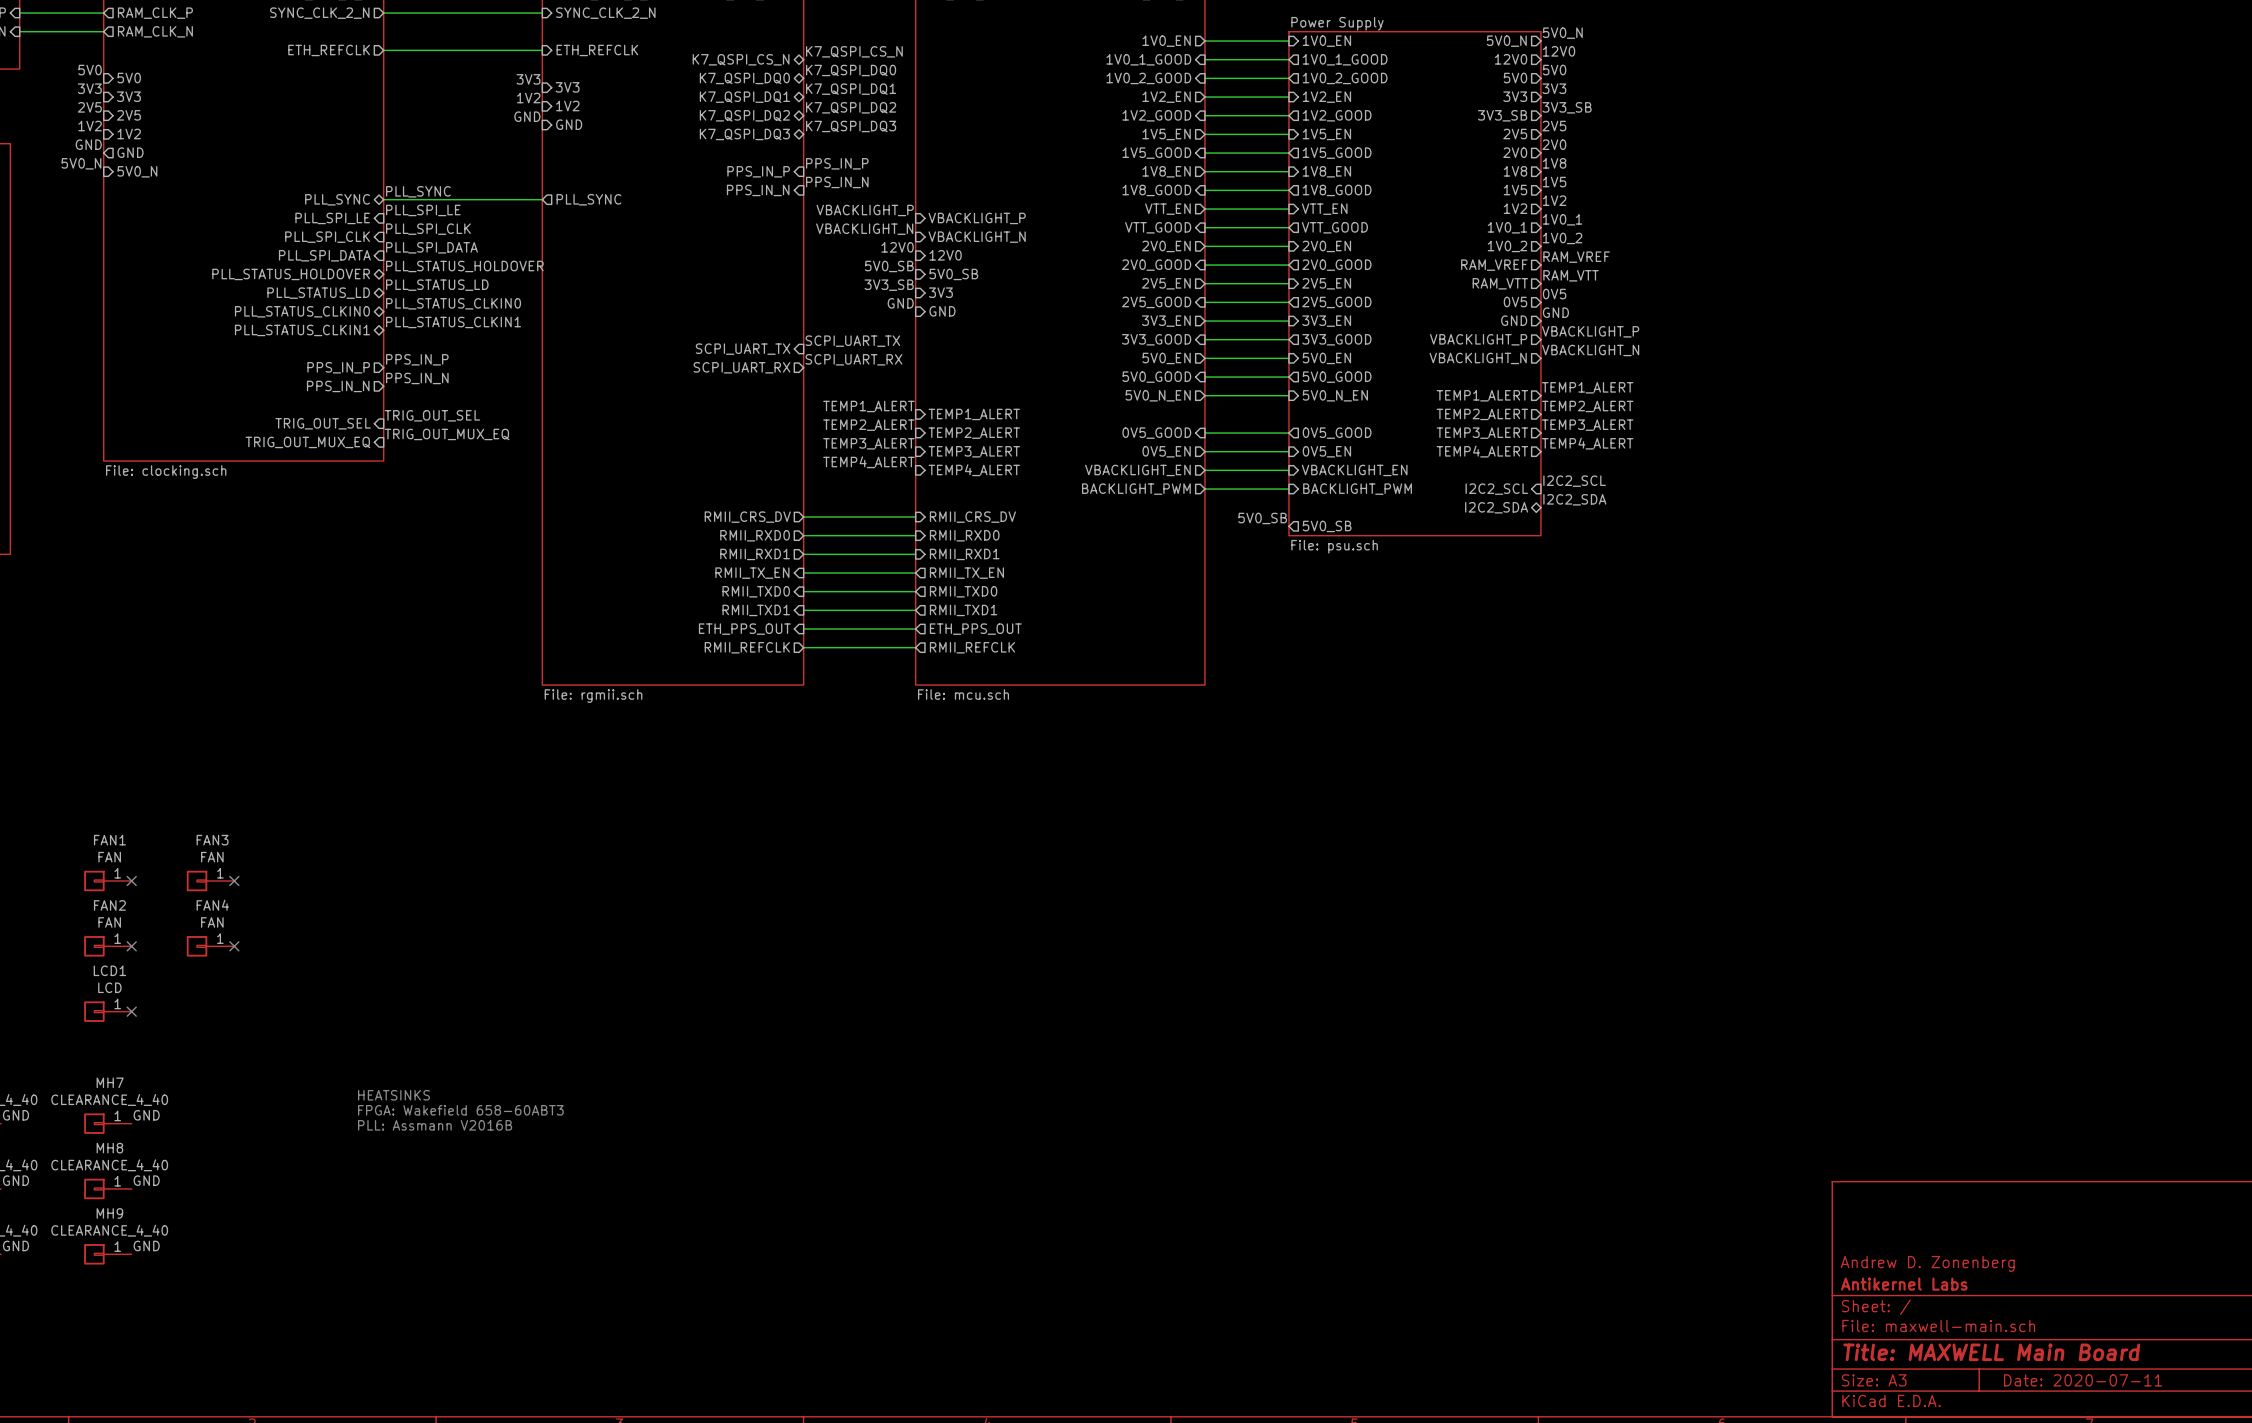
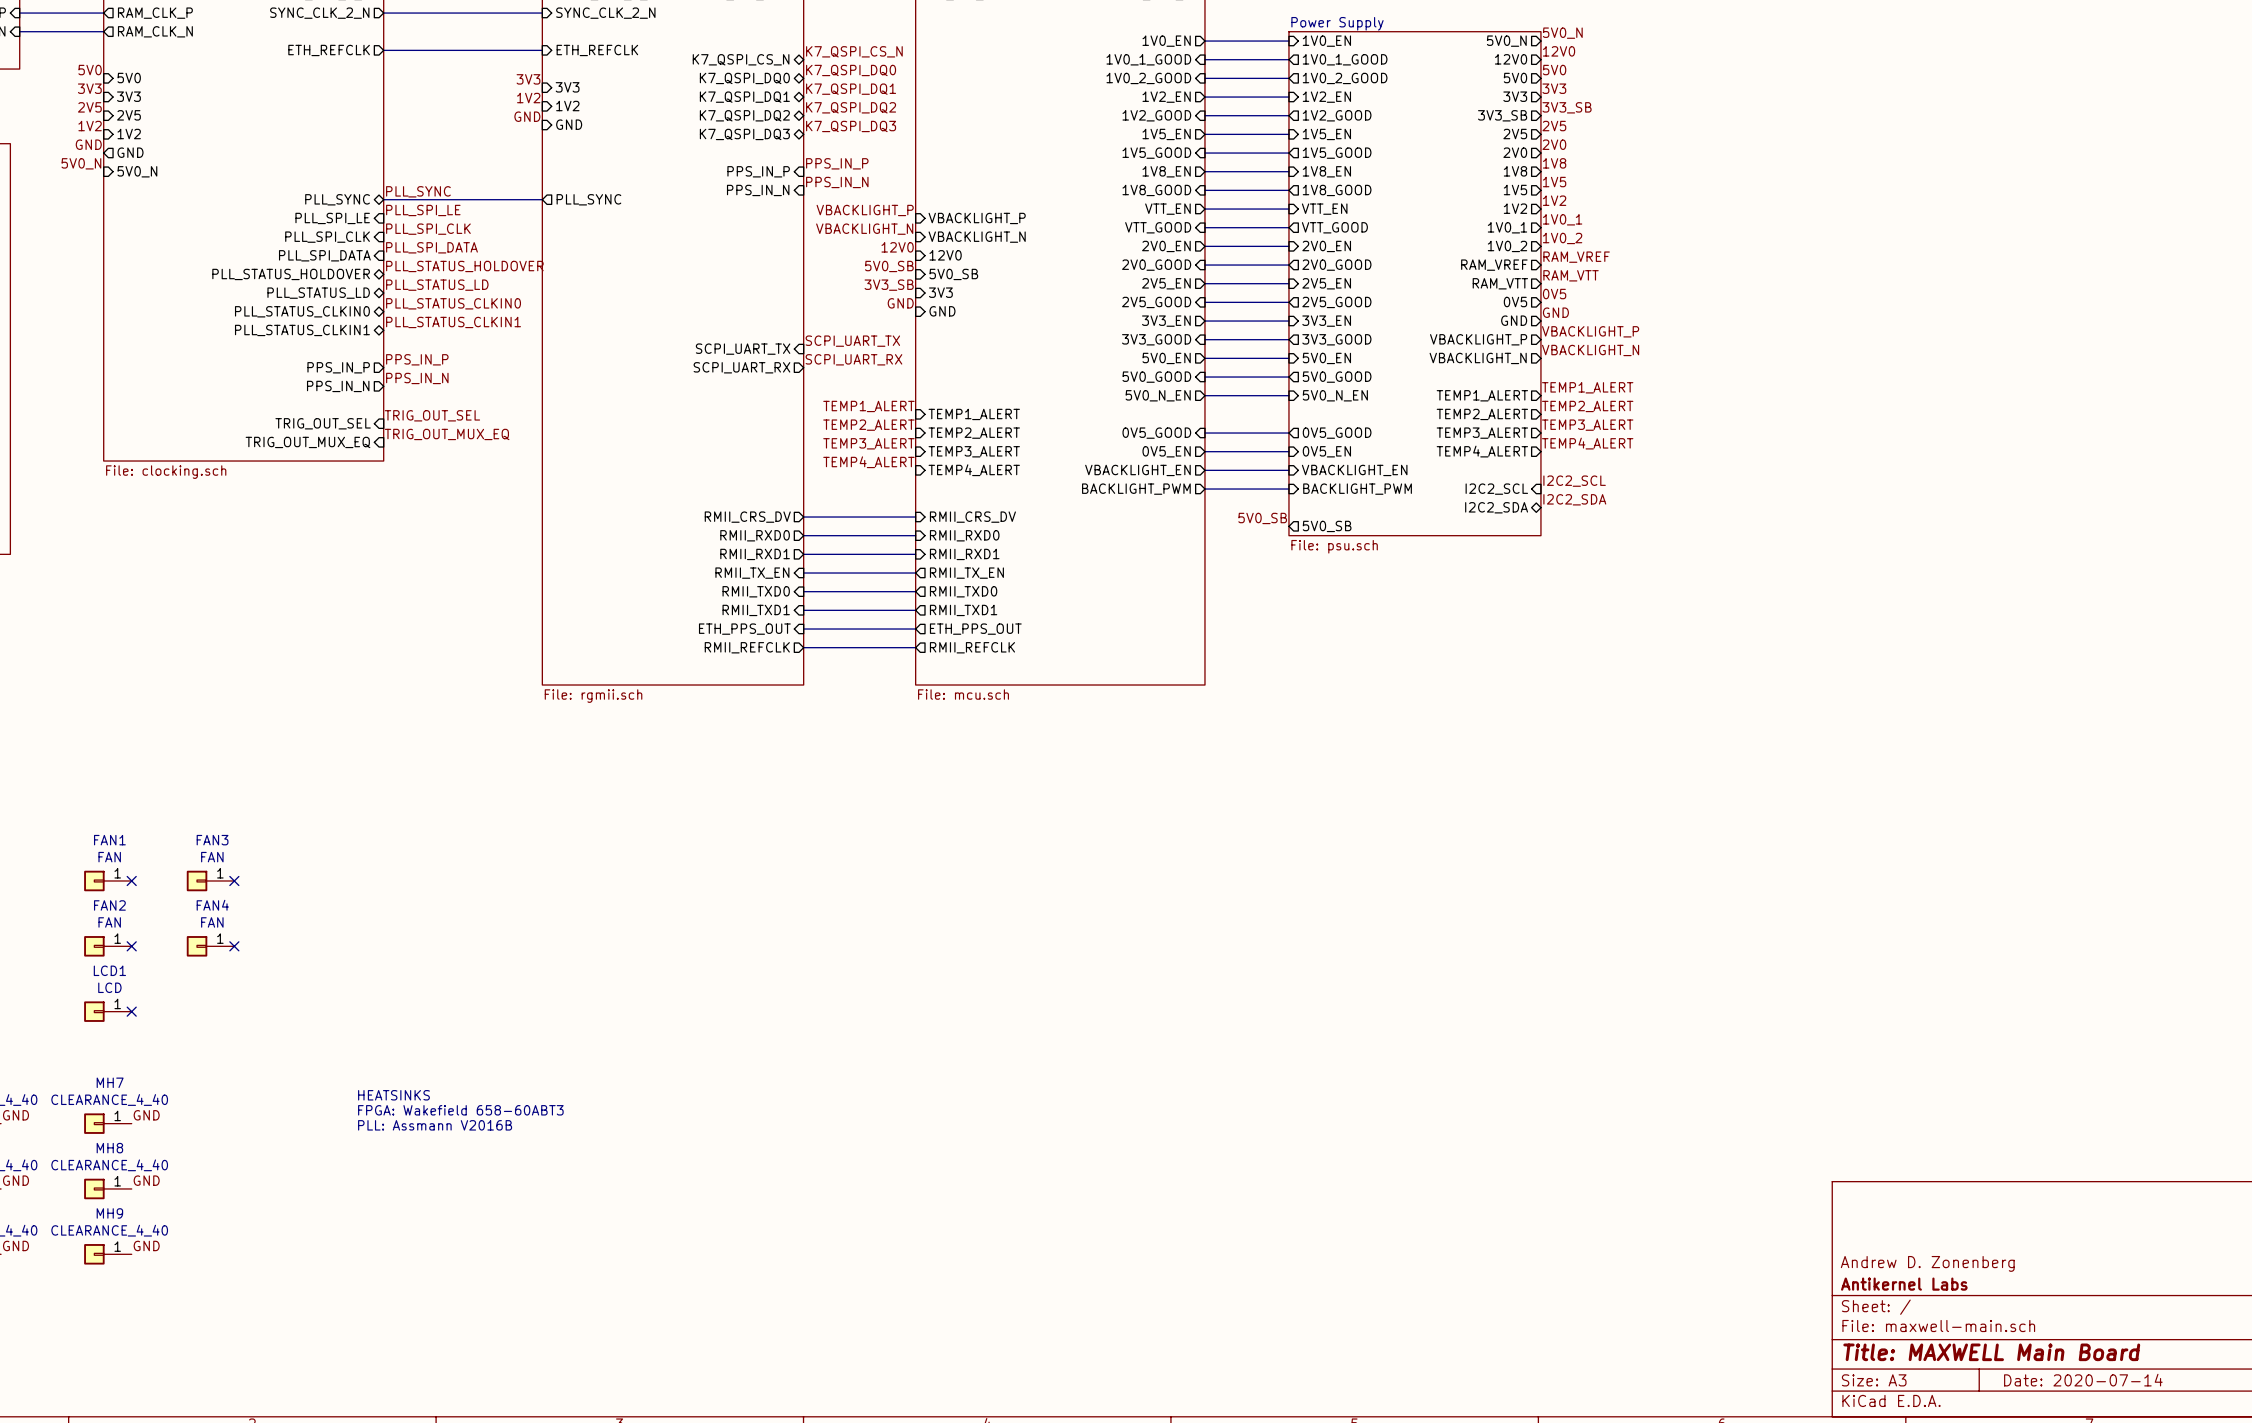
title block: Date: 2020-07-11 (2083, 1380) -> Date: 2020-07-14 (2083, 1380)

